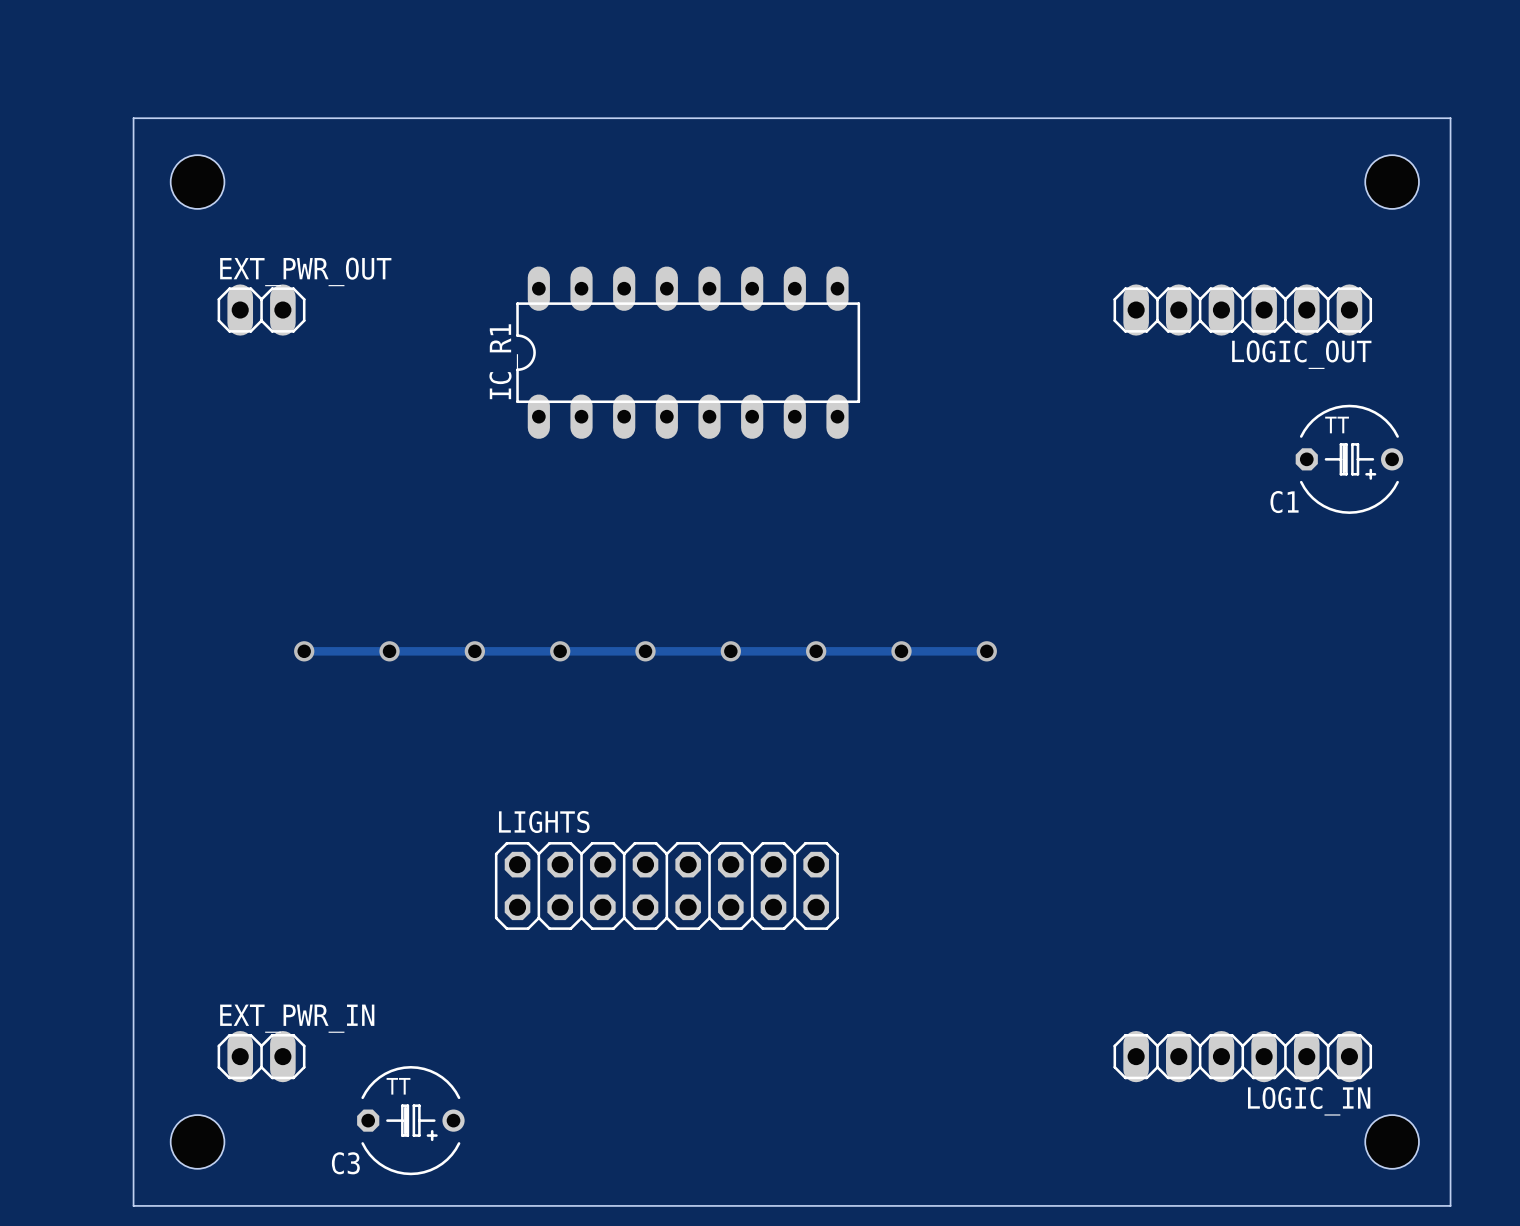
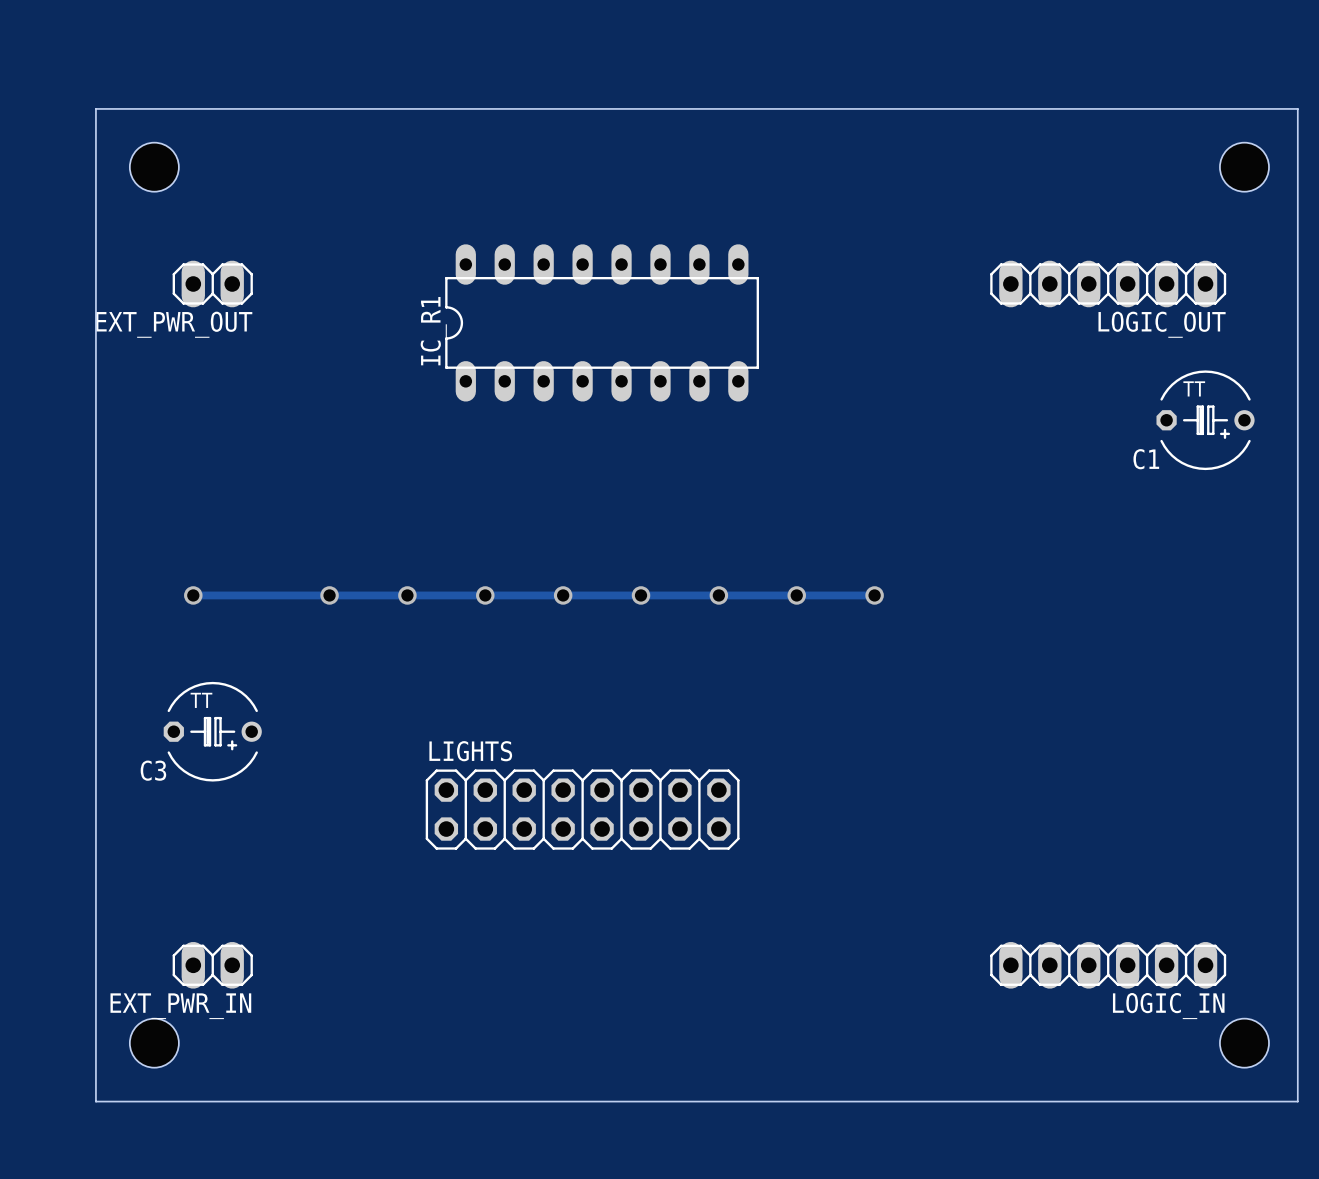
EXT_PWR_OUT name position: EXT_PWR_OUT (305, 271) -> EXT_PWR_OUT (174, 324)
track: none -> (193, 595) (251, 595)
via position: (304, 651) -> (193, 595)
EXT_PWR_IN name position: EXT_PWR_IN (297, 1018) -> EXT_PWR_IN (180, 1006)
C3 position: (410, 1120) -> (212, 731)

